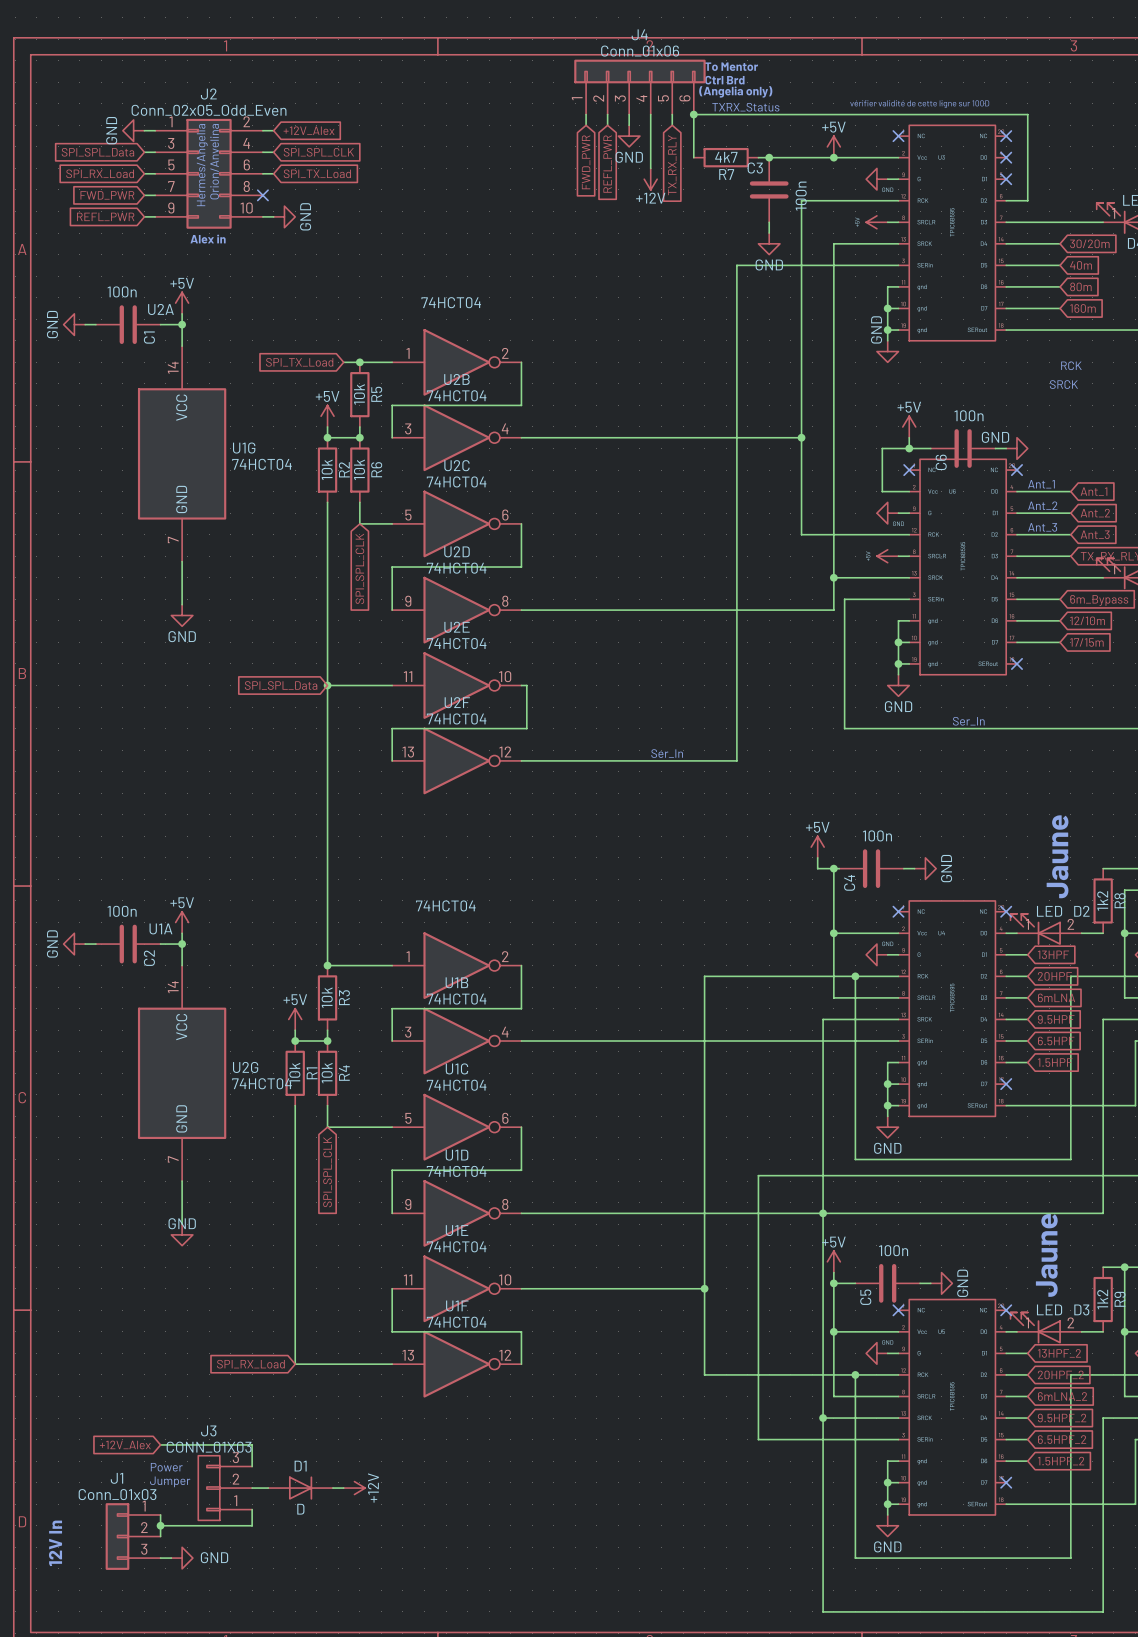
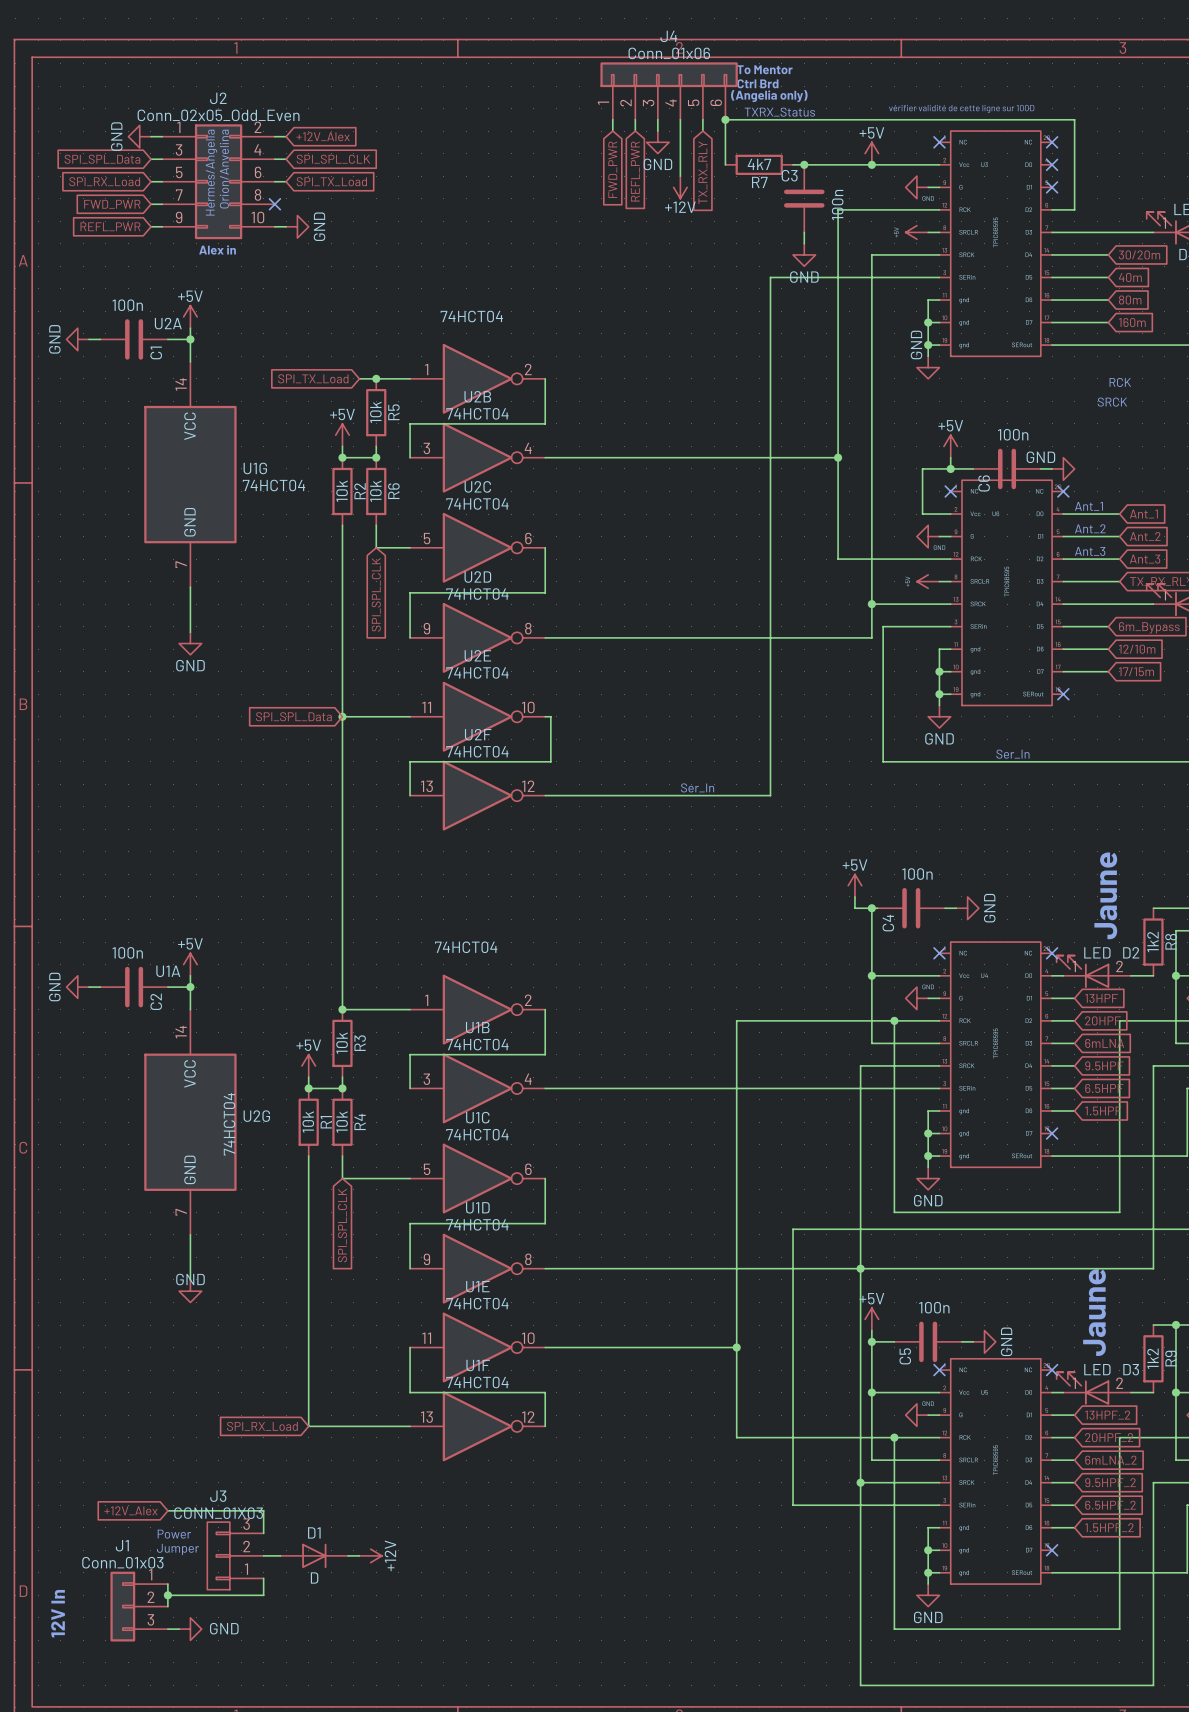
U2G value rotation: 0° (262, 1083) -> 90° counterclockwise (229, 1124)

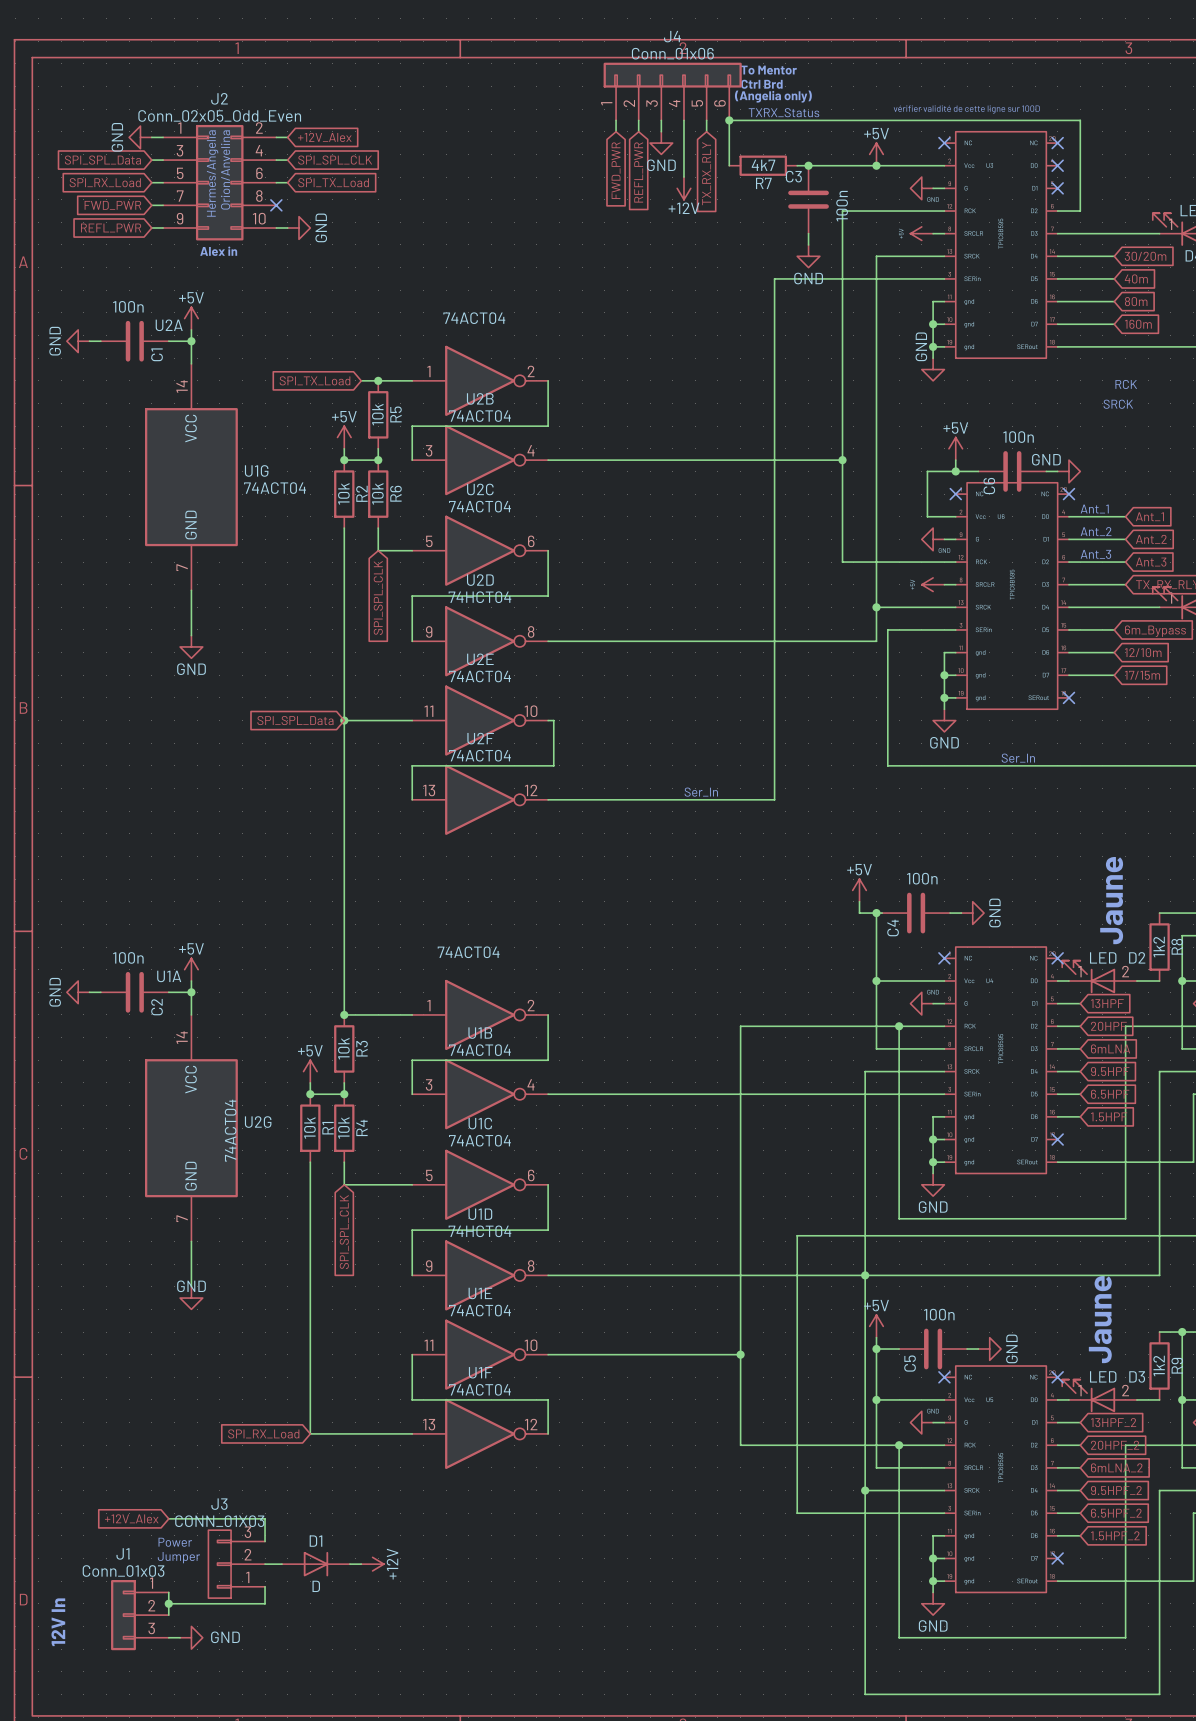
U2A value: 74HCT04 (471, 316) -> 74ACT04 (474, 318)
U2B value: 74HCT04 (477, 413) -> 74ACT04 (479, 416)
U1G value: 74HCT04 (273, 485) -> 74ACT04 (275, 488)
U2C value: 74HCT04 (477, 503) -> 74ACT04 (479, 506)
U2E value: 74HCT04 (477, 672) -> 74ACT04 (479, 676)
U2F value: 74HCT04 (477, 751) -> 74ACT04 (479, 755)
U1A value: 74HCT04 (466, 947) -> 74ACT04 (468, 952)
U1B value: 74HCT04 (477, 1044) -> 74ACT04 (479, 1050)
U2G value: 74HCT04 (229, 1124) -> 74ACT04 (230, 1130)
U1C value: 74HCT04 (477, 1134) -> 74ACT04 (479, 1140)
U1E value: 74HCT04 (477, 1303) -> 74ACT04 (479, 1310)
U1F value: 74HCT04 (477, 1382) -> 74ACT04 (479, 1389)

